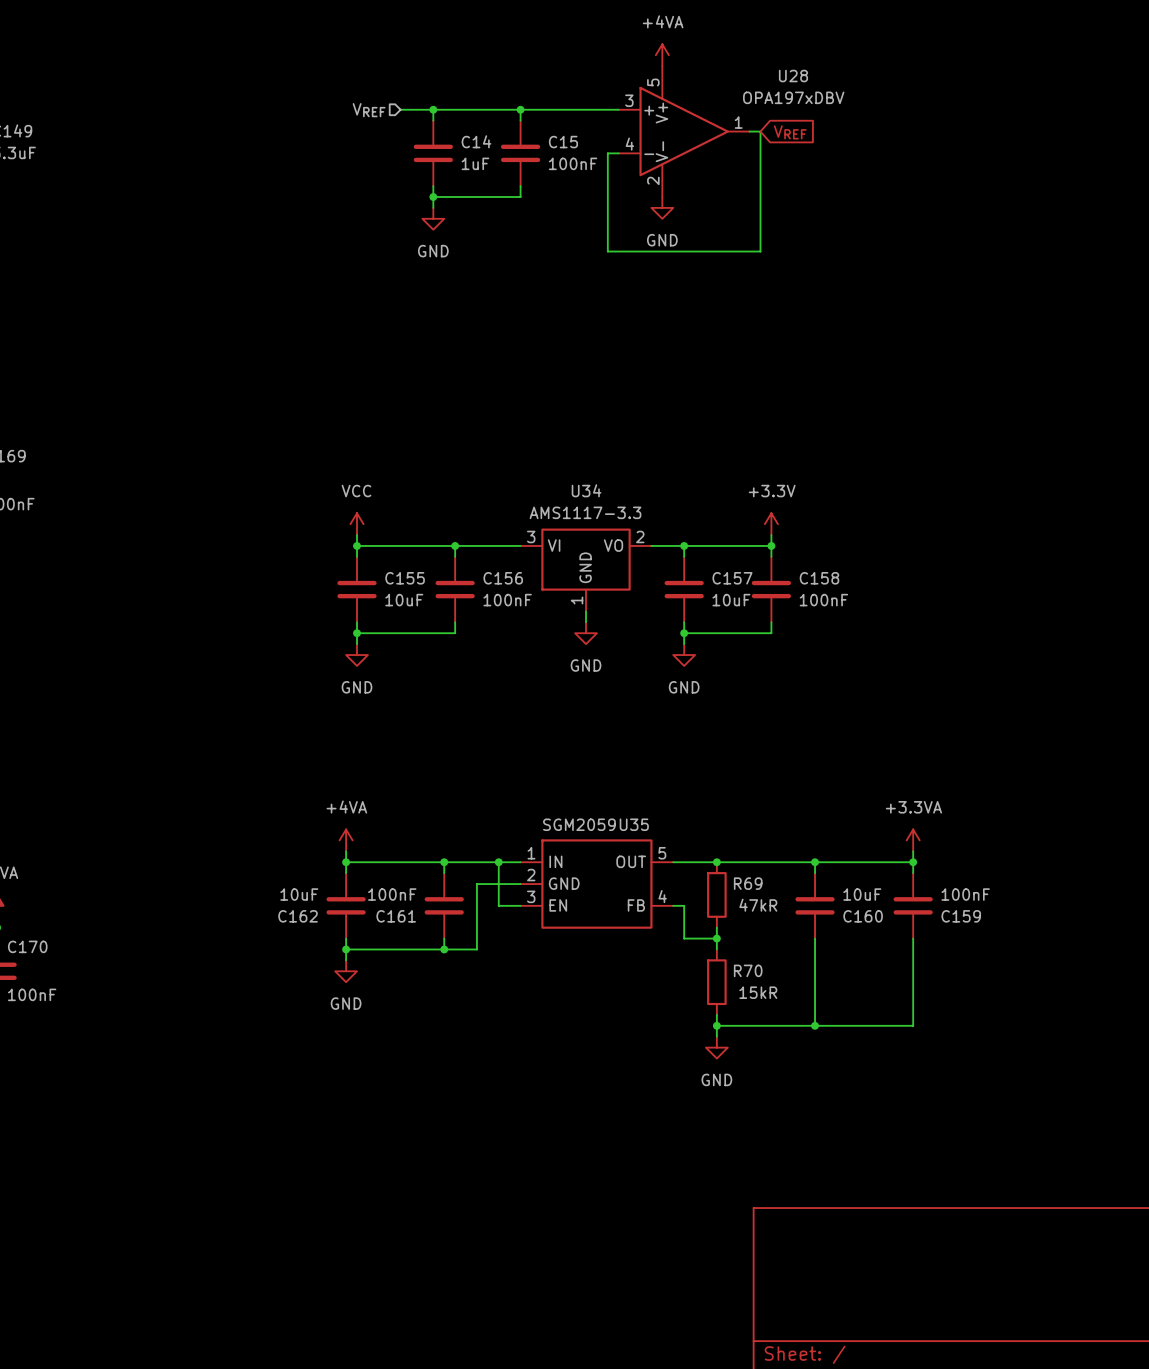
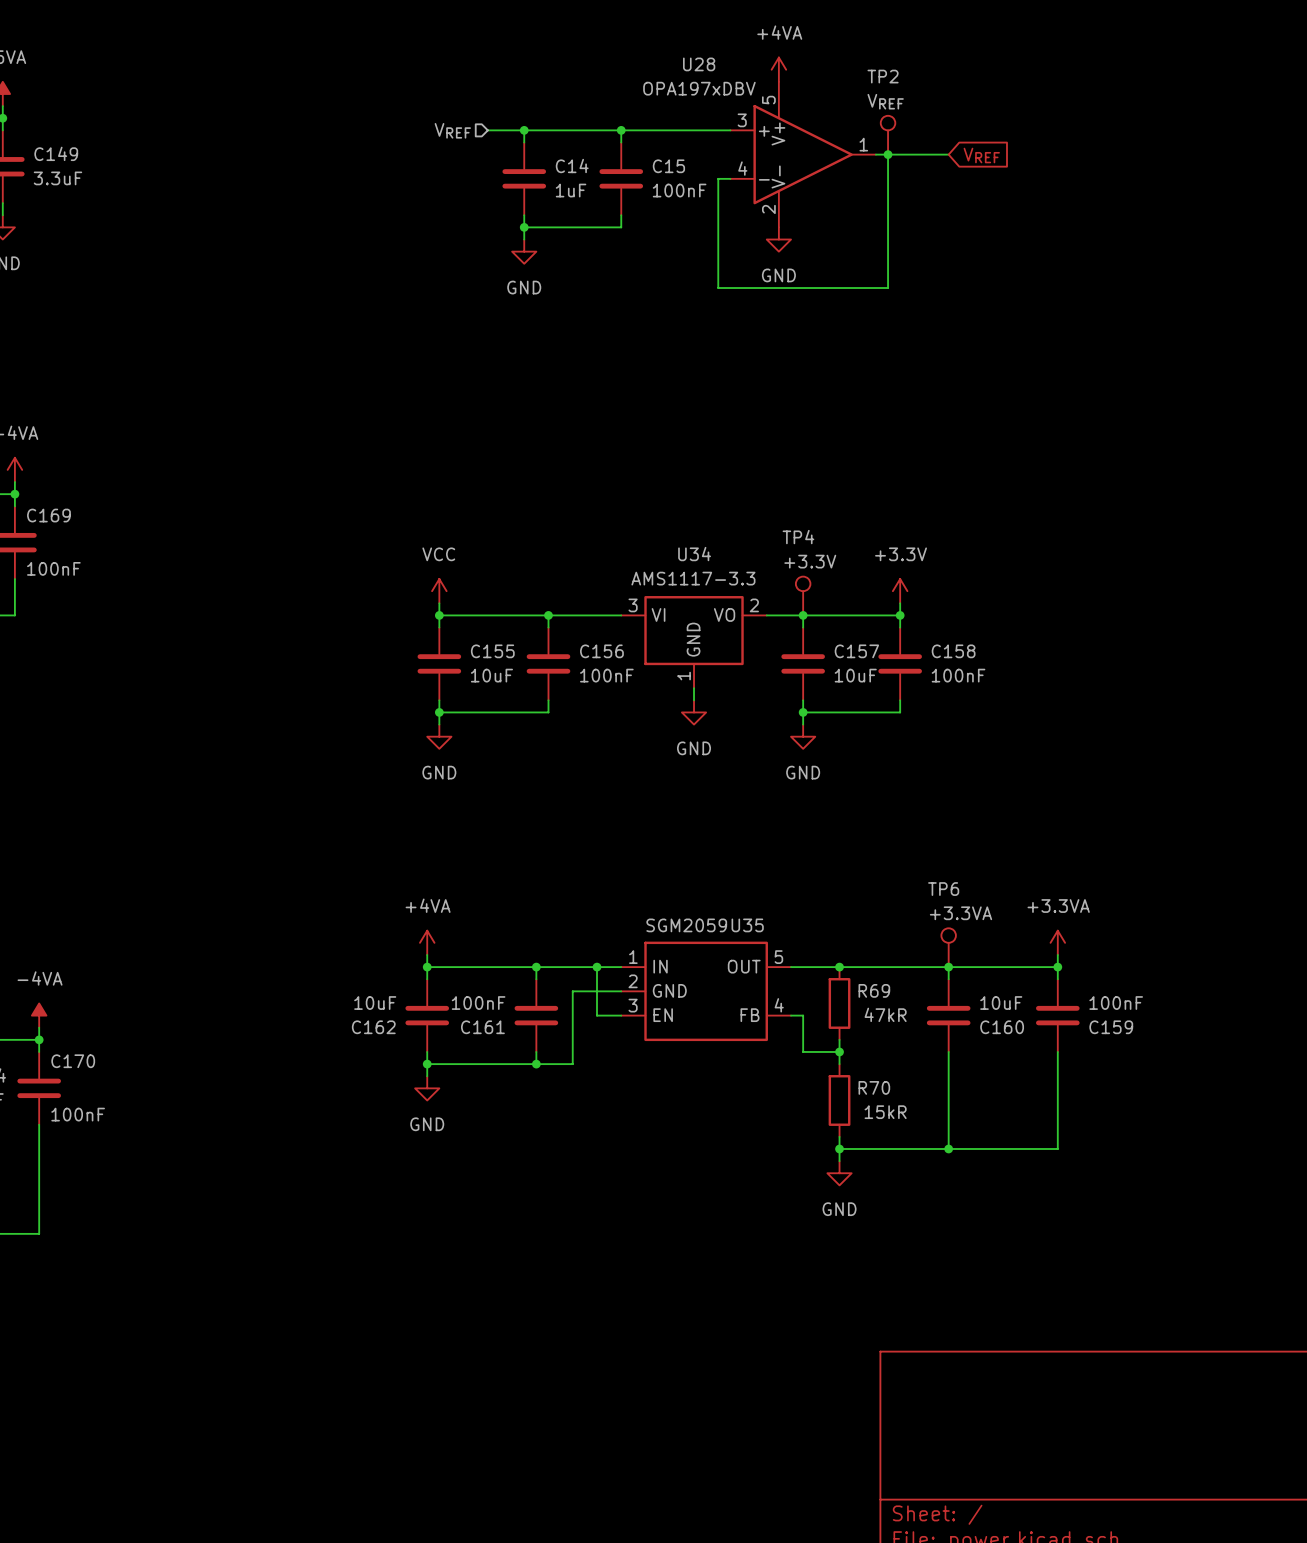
U28 name position: U28 (793, 76) -> U28 (699, 64)
U28 value position: OPA197xDBV (793, 97) -> OPA197xDBV (699, 88)
TP2: none -> VREF (888, 135)
wire: none -> (888, 154) (948, 154)
junction: none -> (888, 154)
global label position: VREF (790, 132) -> VREF (981, 155)
TP4: none -> +3.3V (803, 596)
TP6: none -> +3.3VA (948, 947)

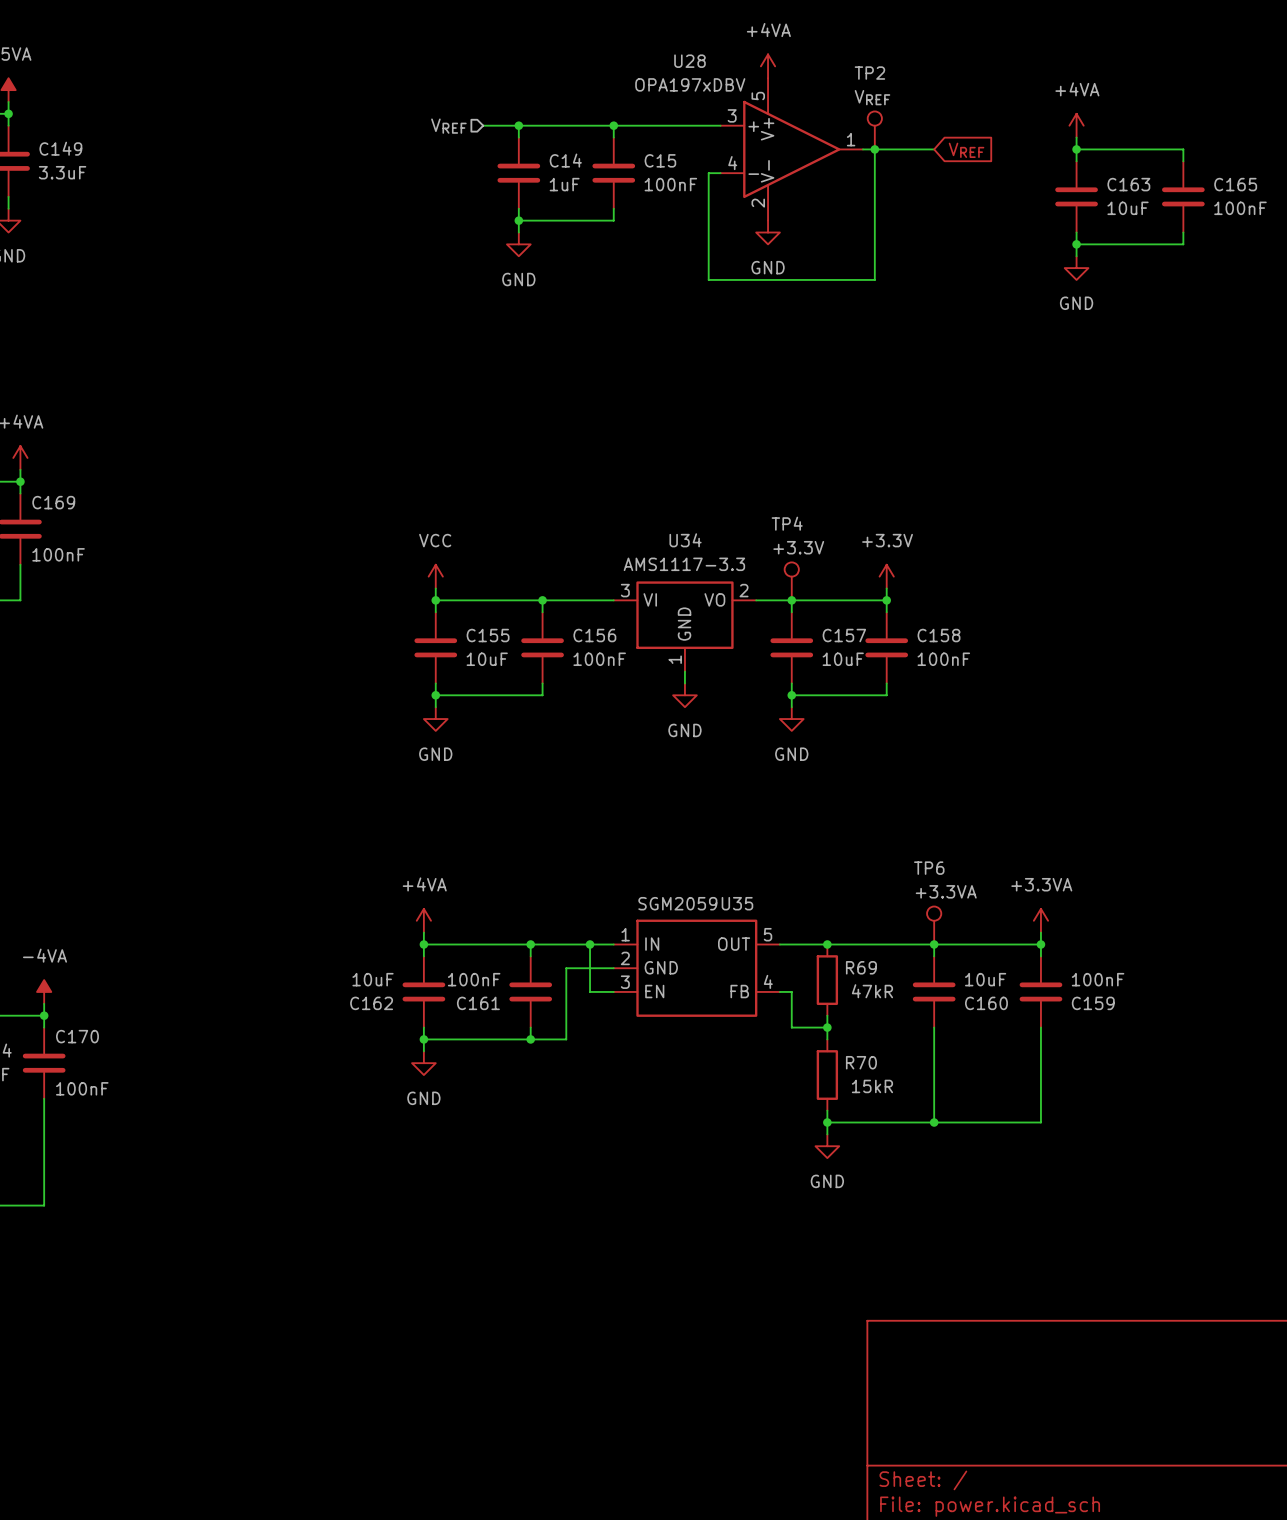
power symbol: none -> +4VA (1076, 125)
wire: none -> (1076, 137) (1076, 161)
wire: none -> (1076, 149) (1183, 149) (1183, 161)
junction: none -> (1076, 149)
C163: none -> 10uF (1076, 196)
C165: none -> 100nF (1183, 196)
wire: none -> (1076, 232) (1076, 256)
wire: none -> (1183, 232) (1183, 244) (1076, 244)
junction: none -> (1076, 244)
power symbol: none -> GND (1076, 268)

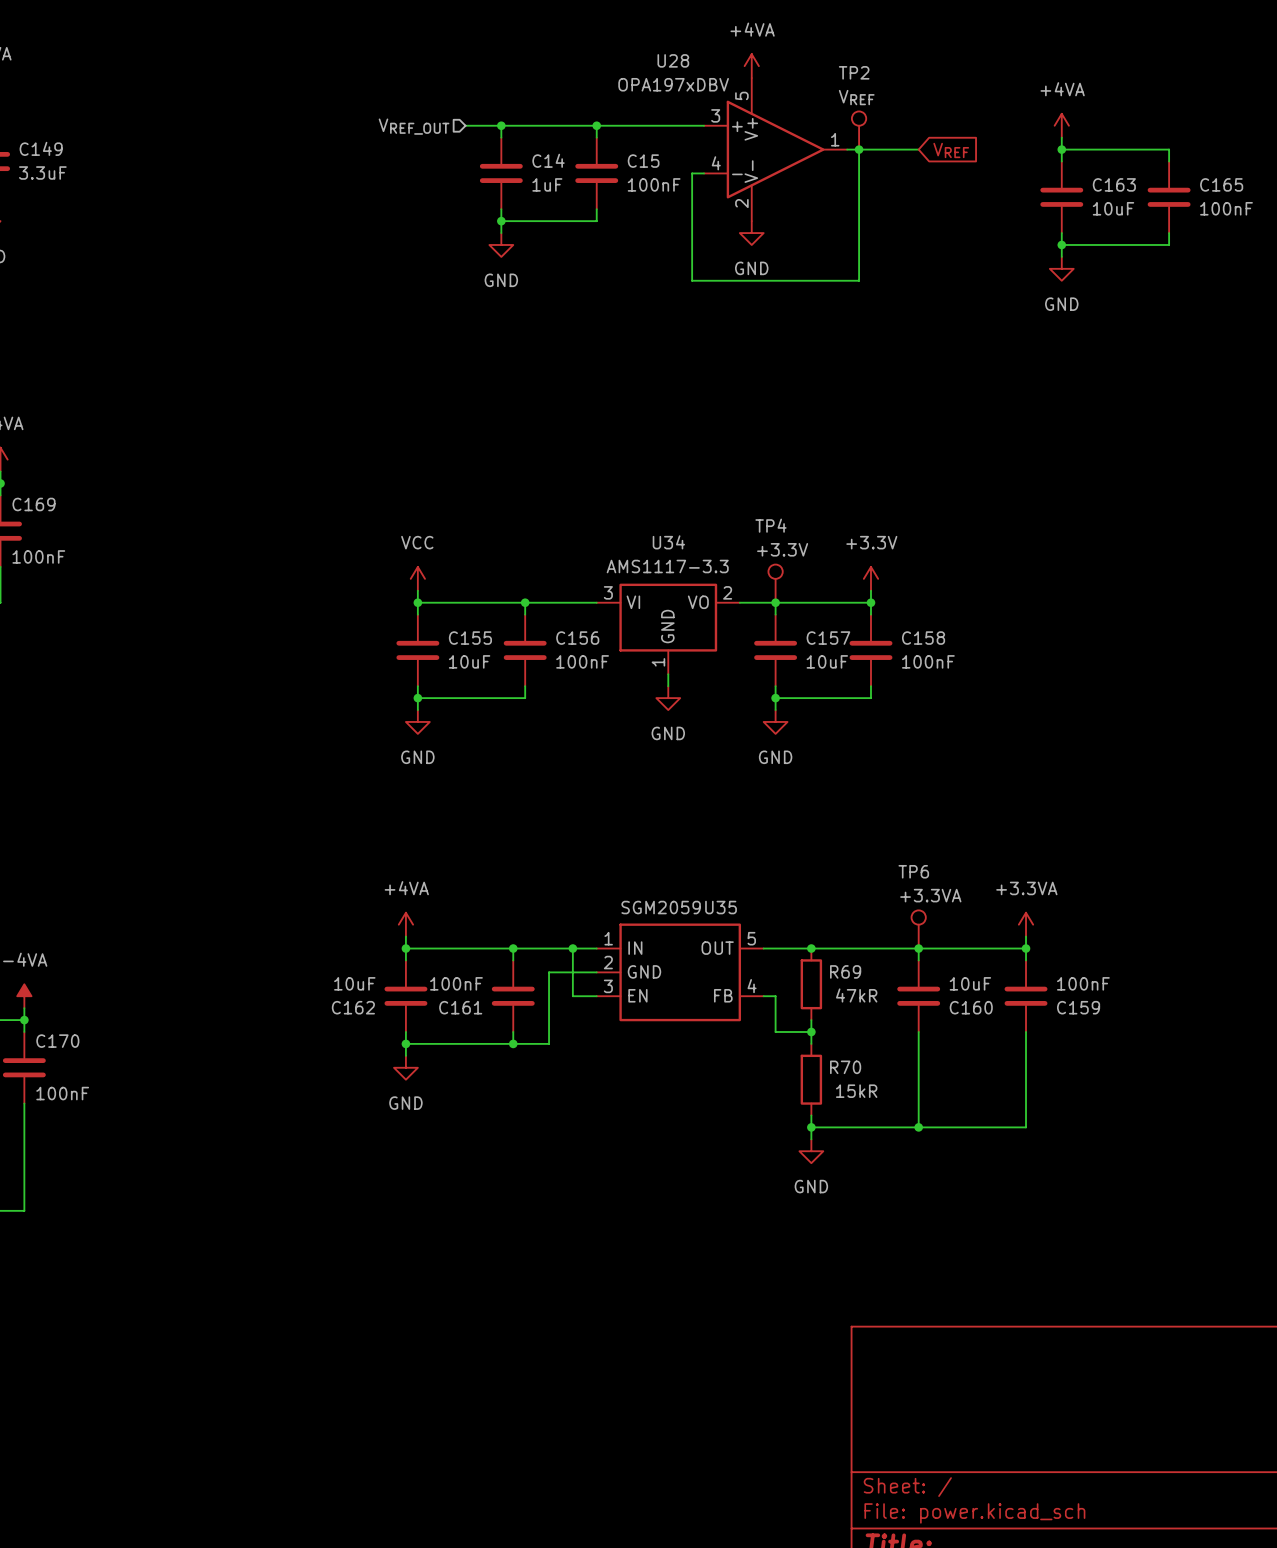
hierarchical label: VREF (448, 126) -> VREF_OUT (414, 126)

